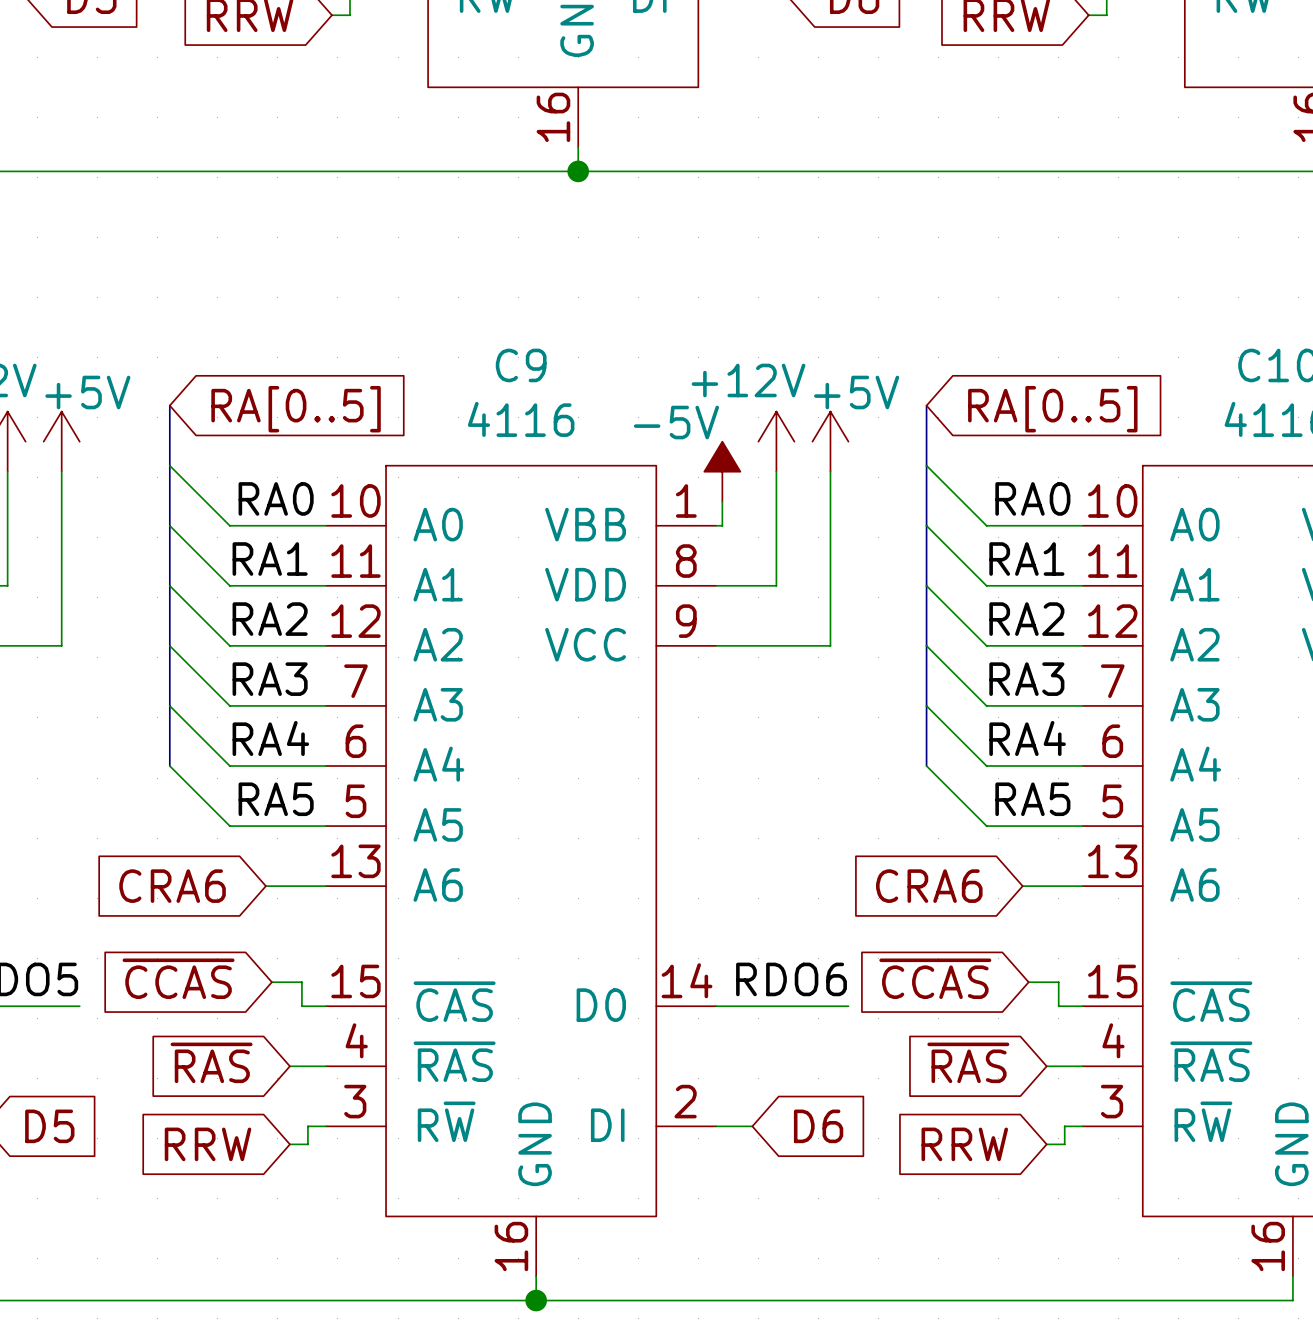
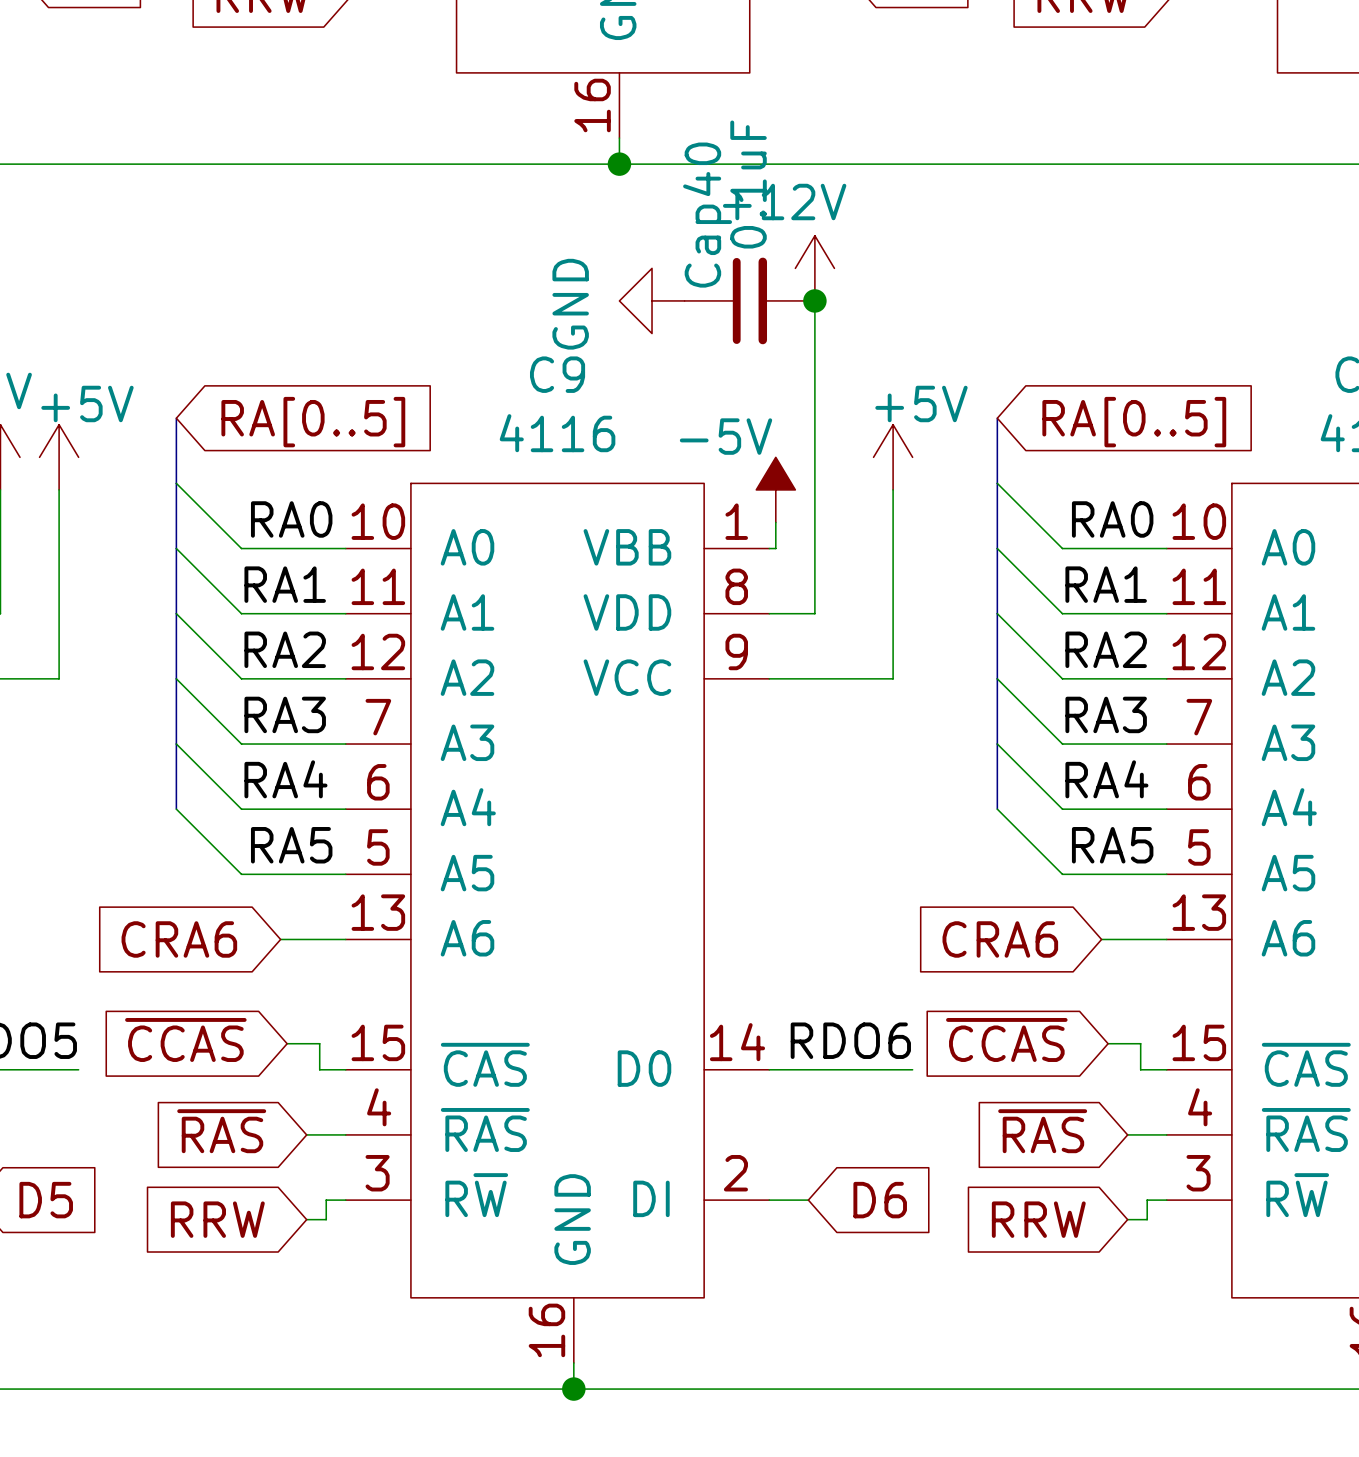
power symbol: none -> GND (652, 300)
Cap40: none -> 0.1uF (749, 300)
junction: none -> (814, 300)
power symbol position: +12V (776, 441) -> +12V (814, 268)
wire: (776, 471) (776, 585) (758, 585) -> (814, 300) (814, 613)

